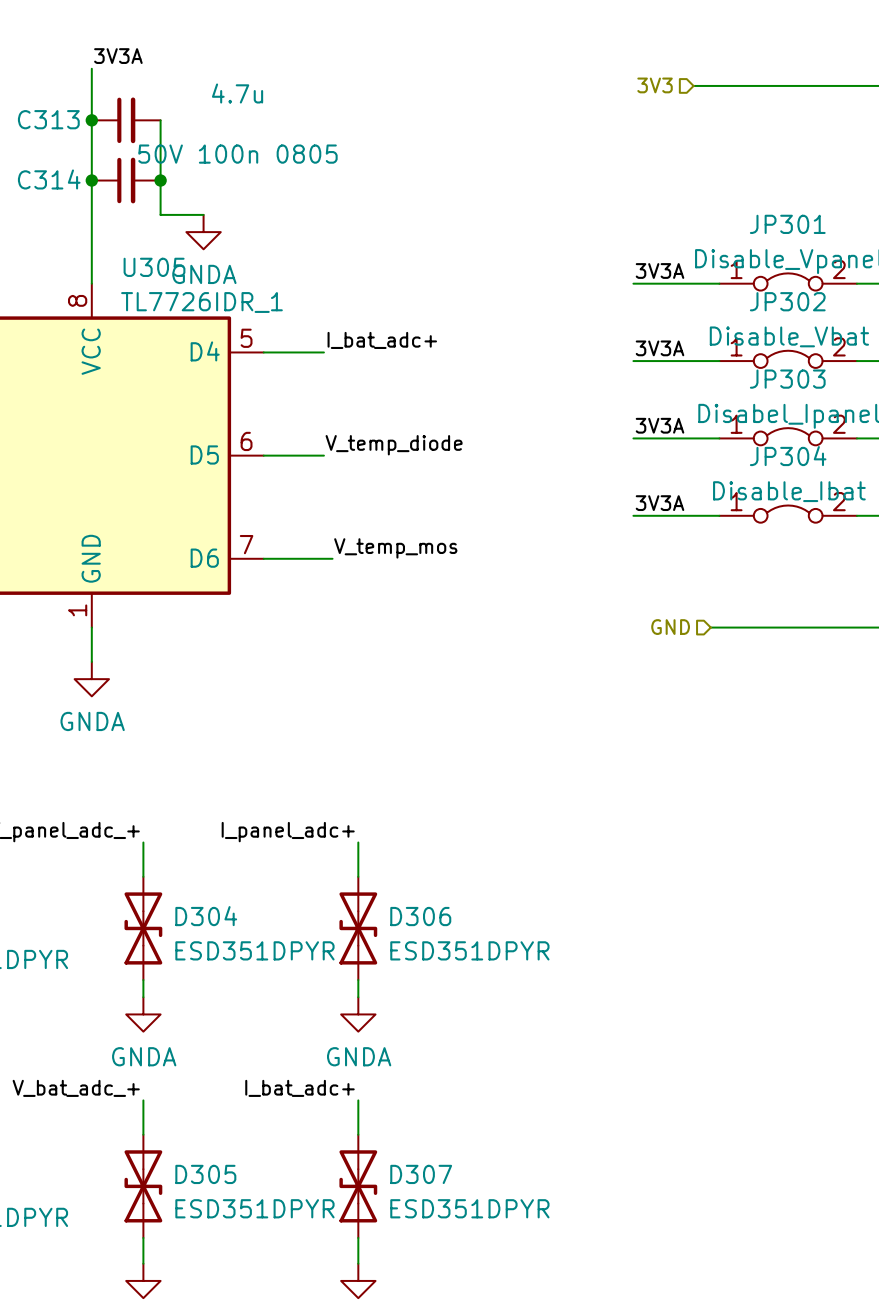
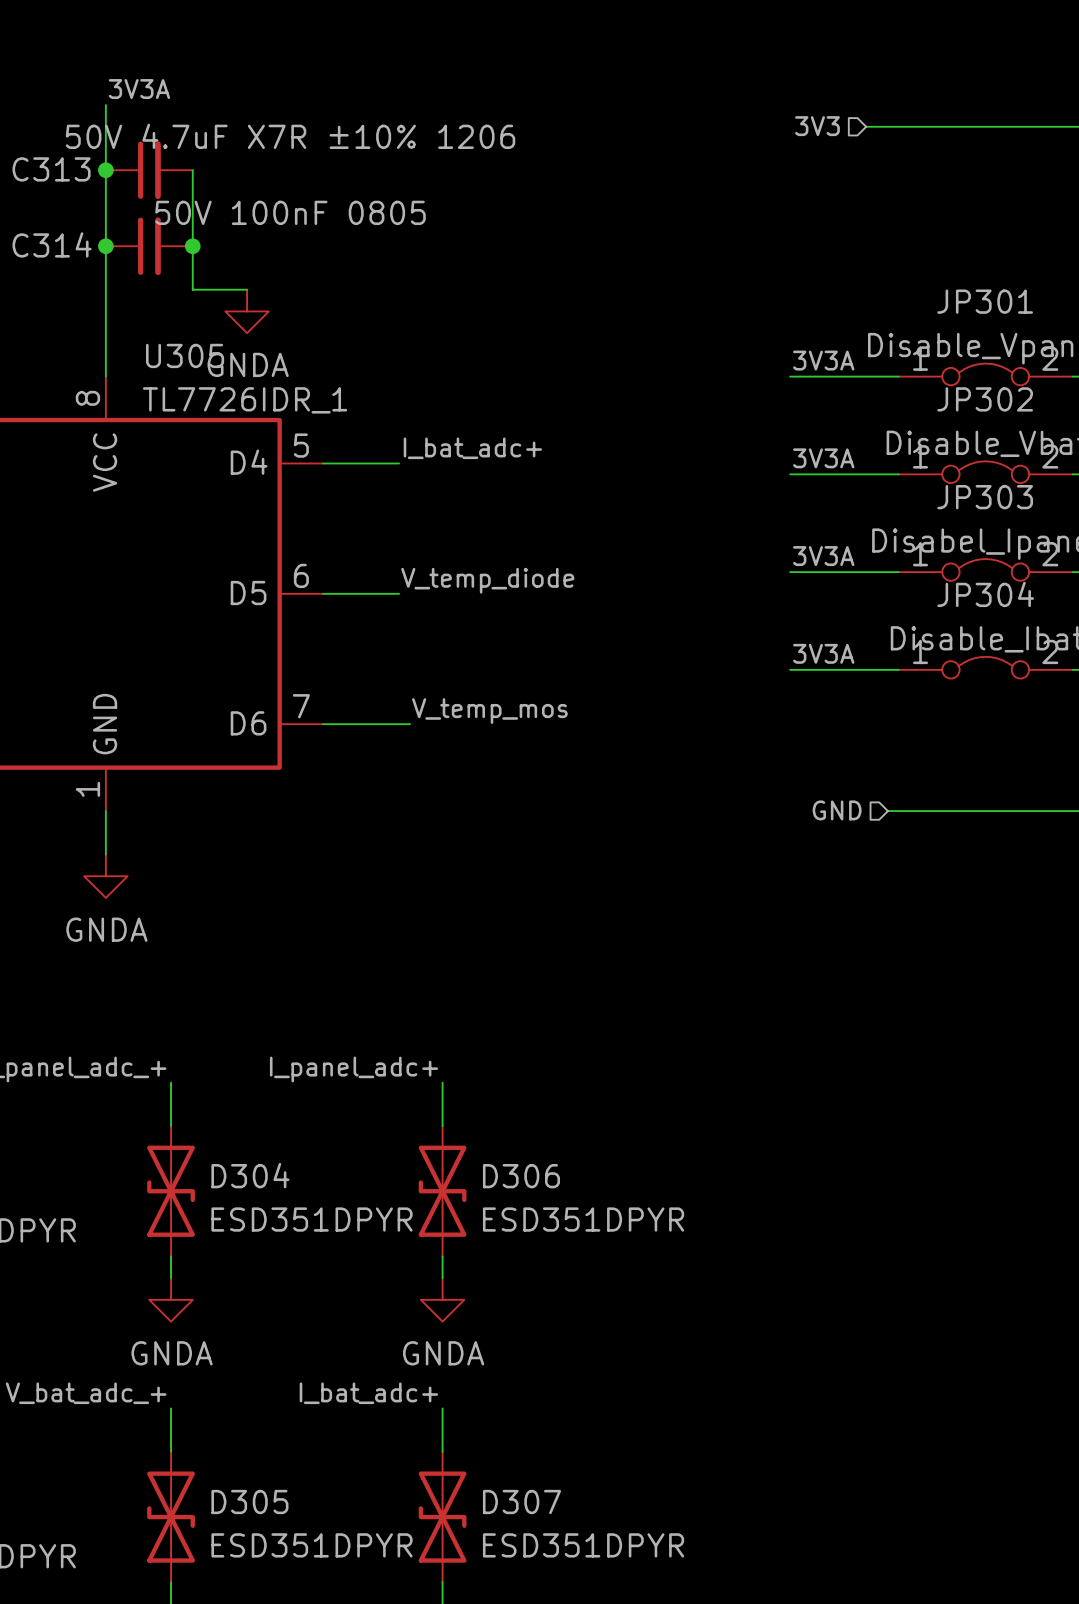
C313 value: 4.7u (237, 93) -> 50V 4.7uF X7R ±10% 1206 (290, 136)
C314 value: 50V 100n 0805 (237, 154) -> 50V 100nF 0805 (290, 212)

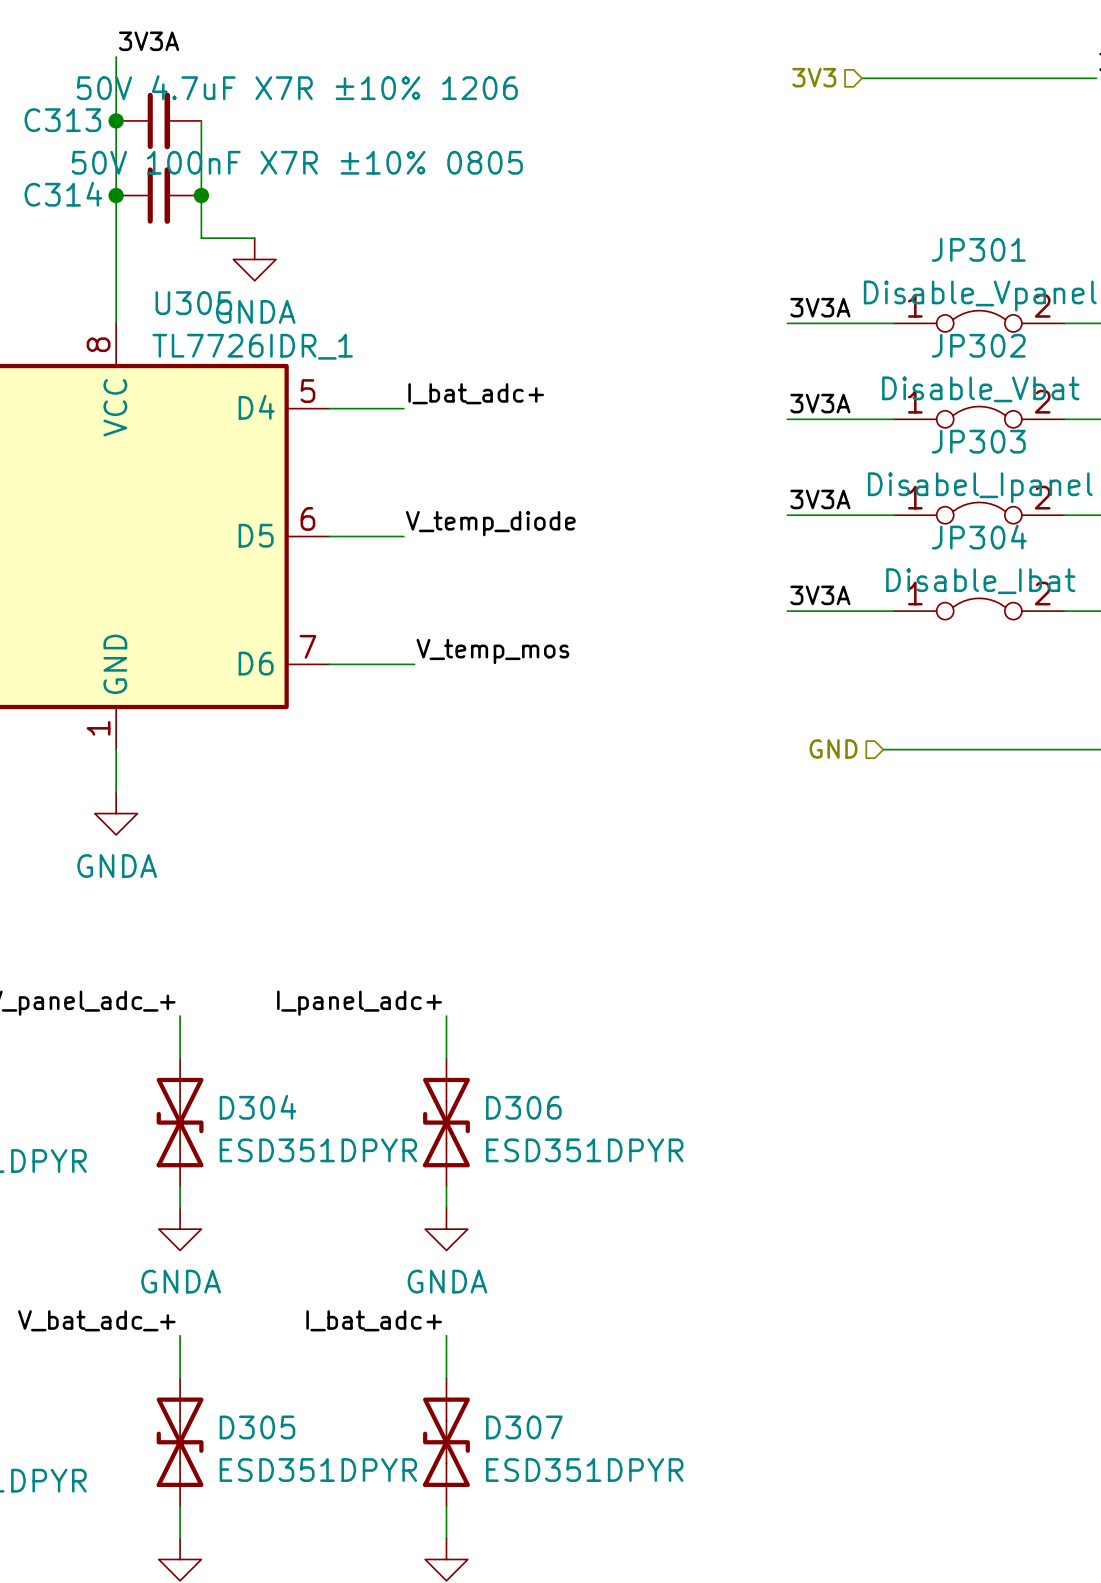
C314 value: 50V 100nF 0805 (290, 212) -> 50V 100nF X7R ±10% 0805 (297, 162)

